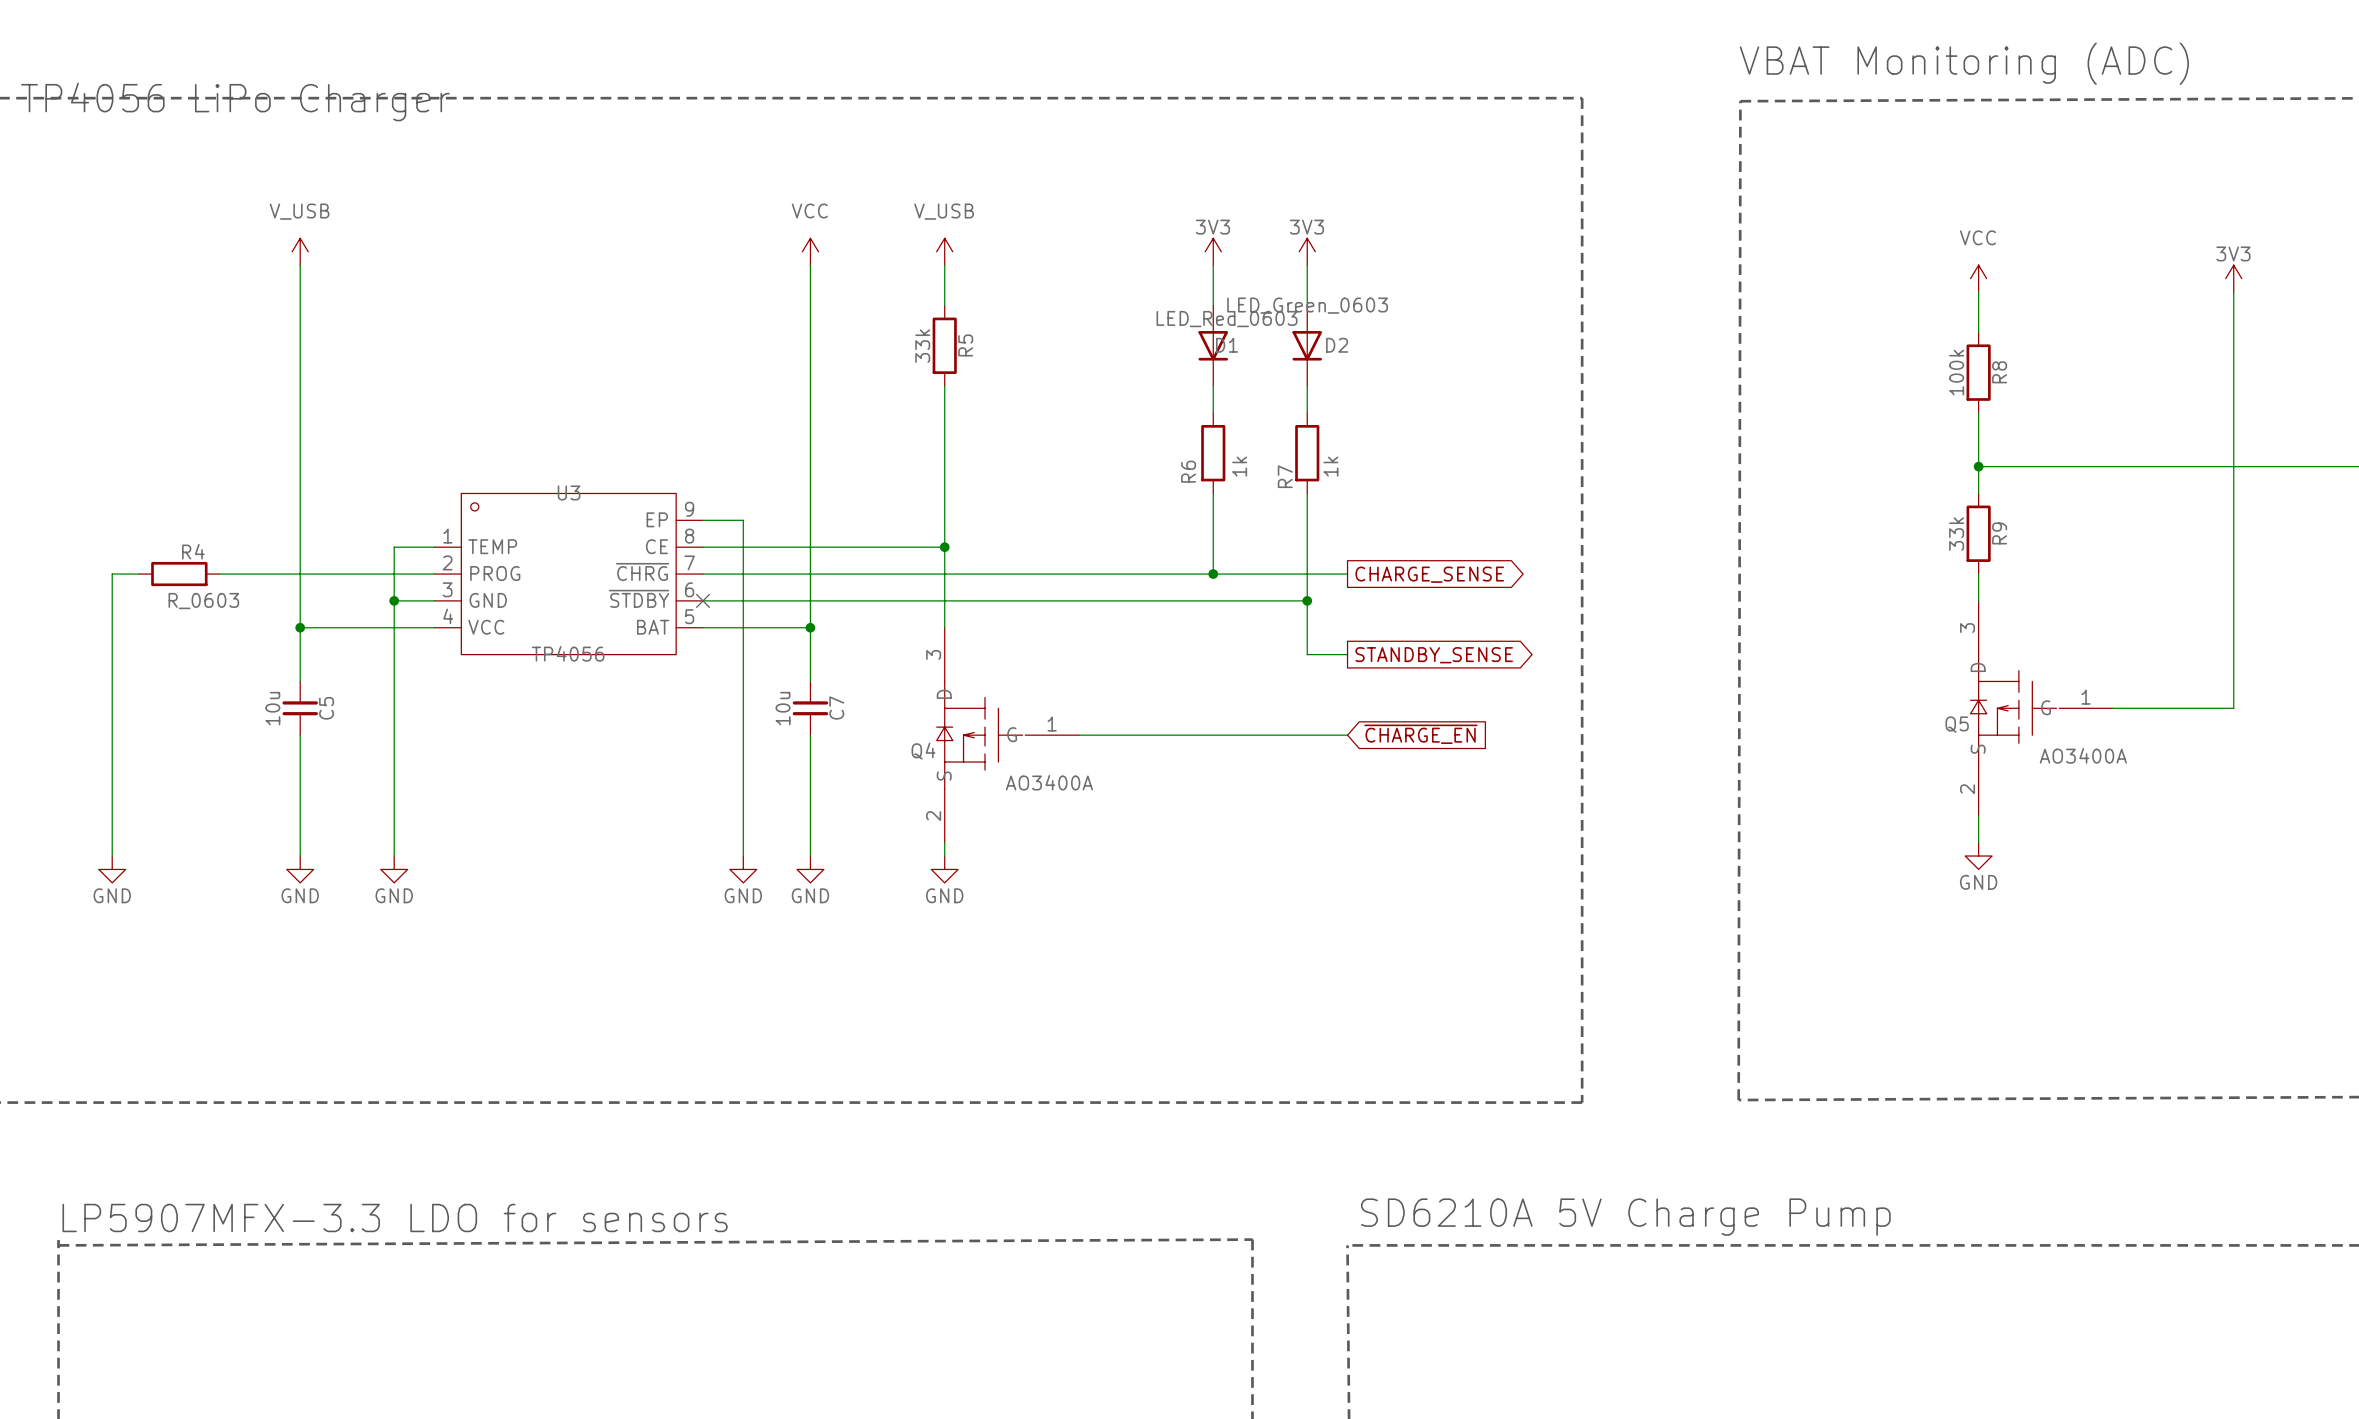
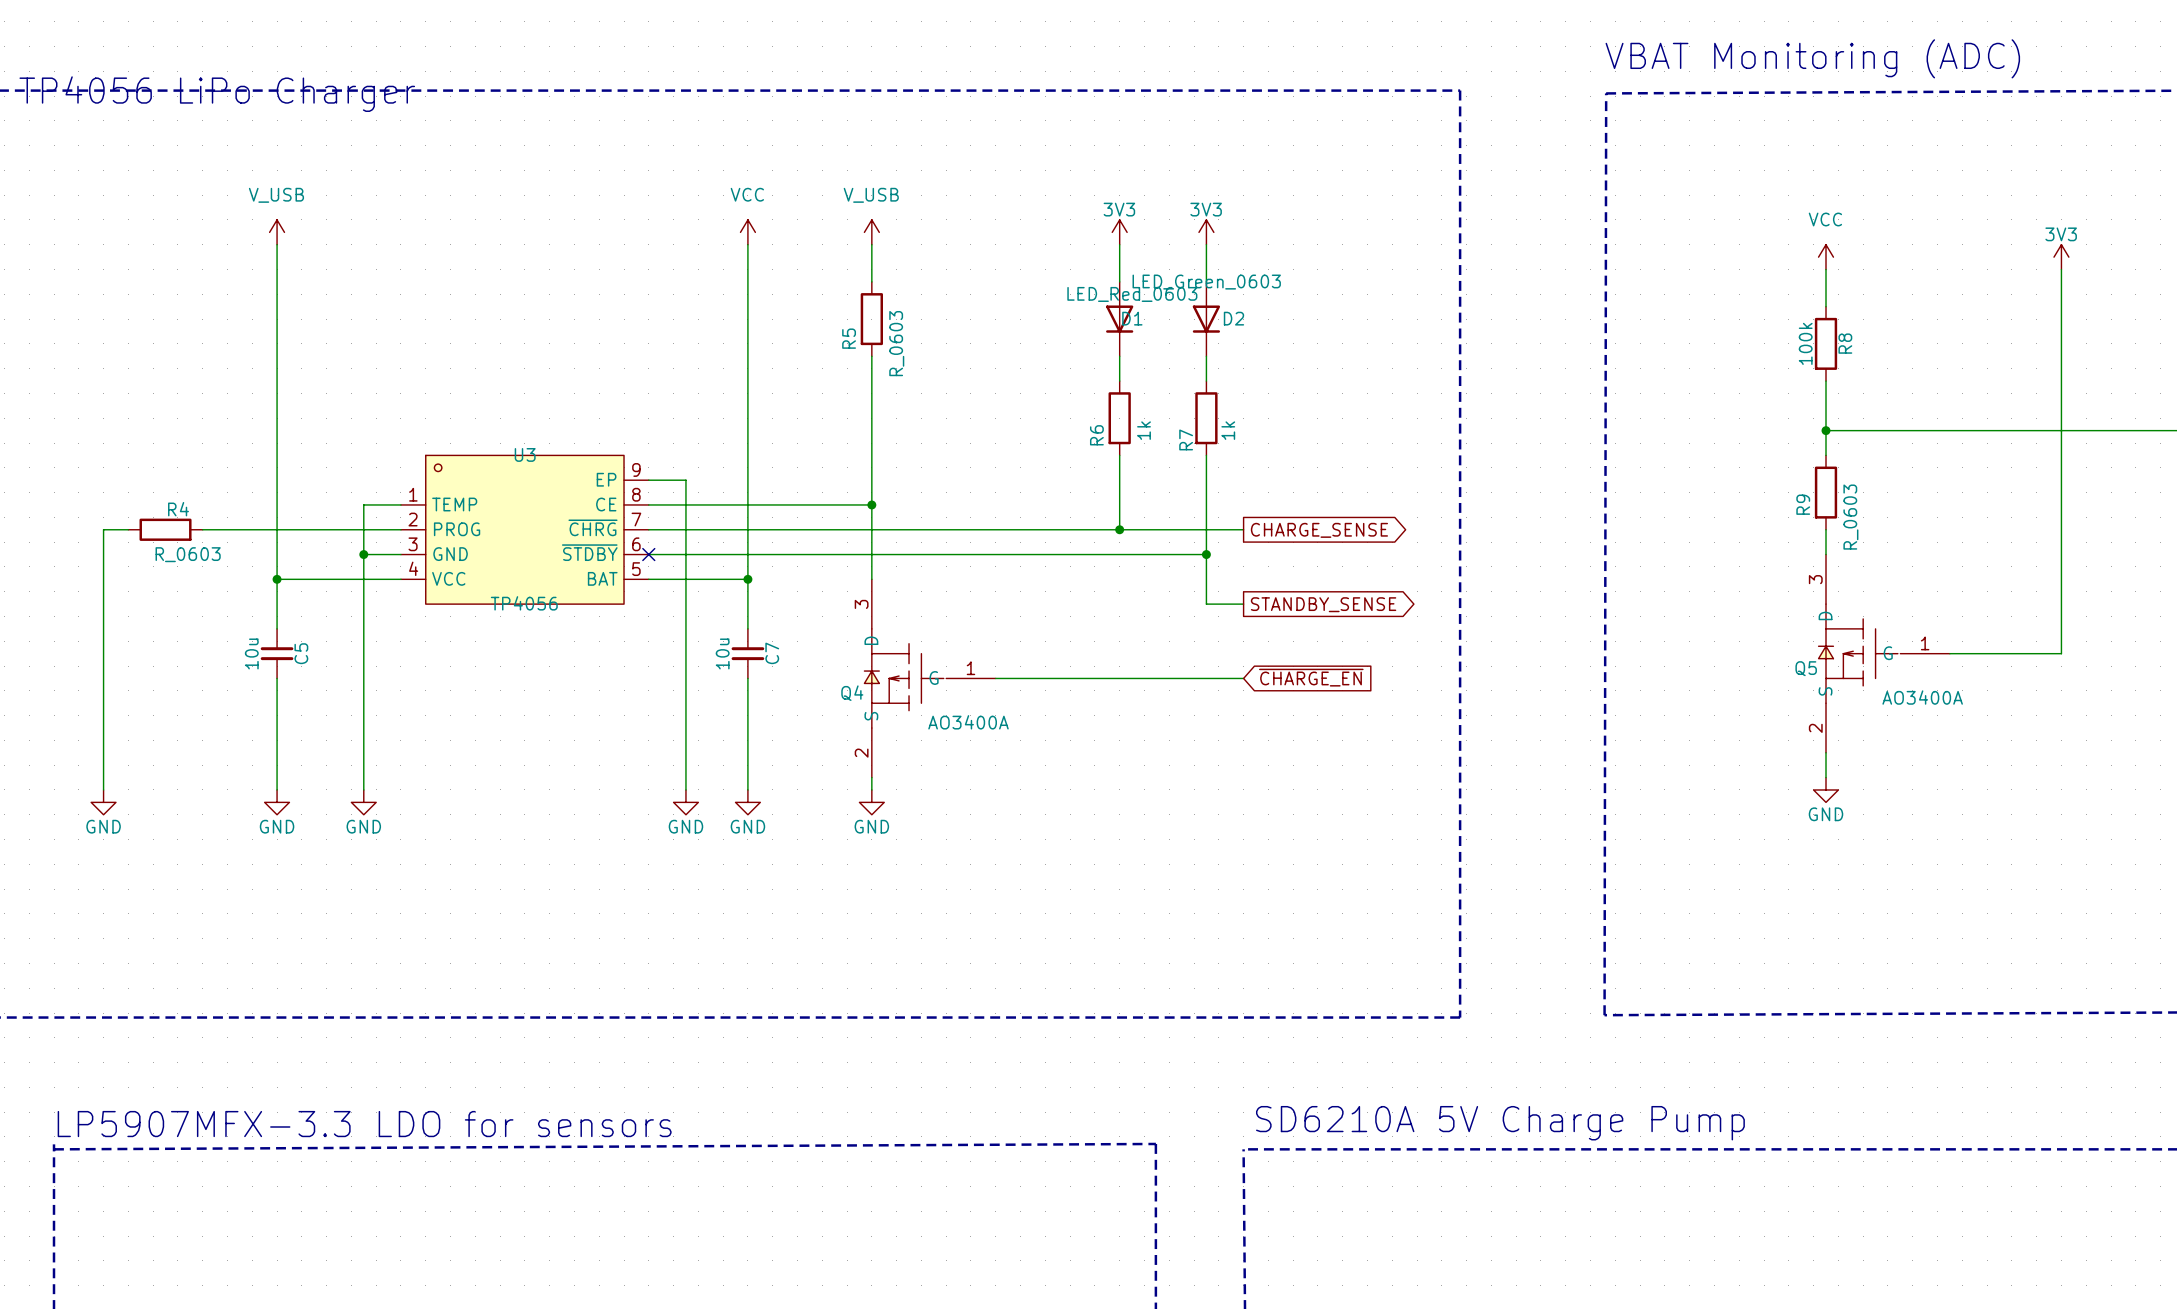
R5 name position: R5 (965, 345) -> R5 (849, 338)
R5 value: 33k (922, 346) -> R_0603 (896, 343)
R9 name position: R9 (1999, 533) -> R9 (1803, 504)
R9 value: 33k (1956, 534) -> R_0603 (1850, 517)

